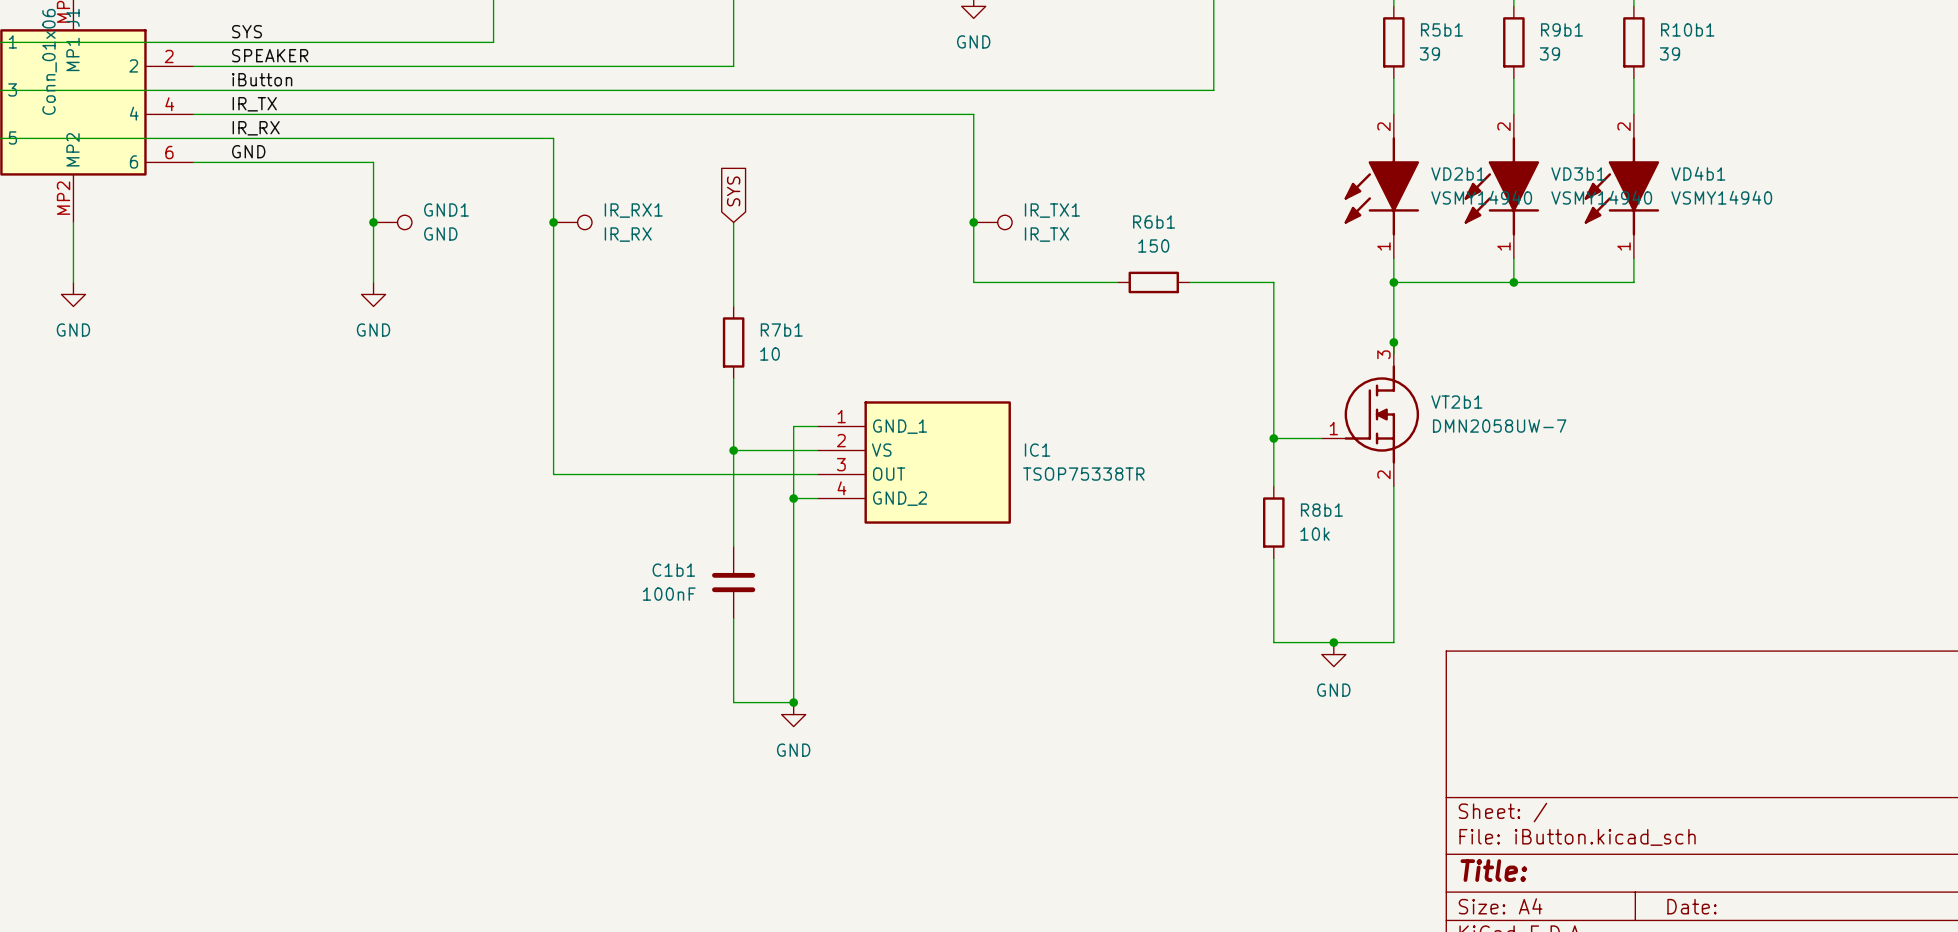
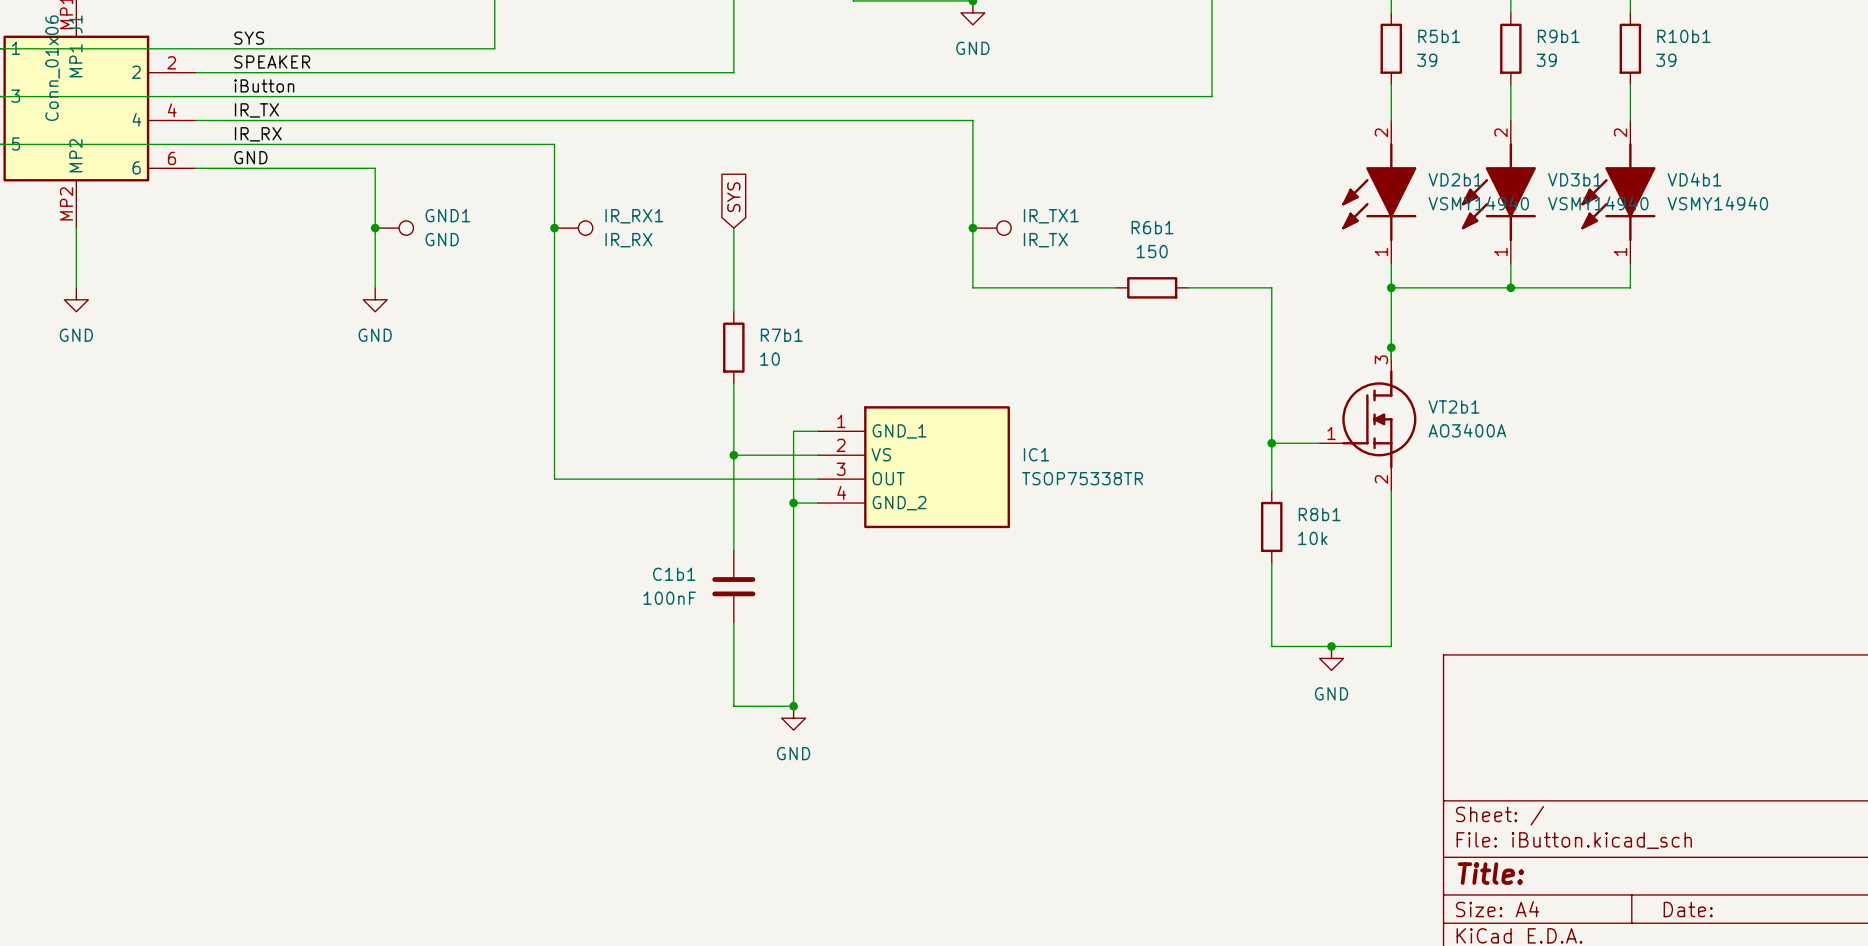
VT2b1 value: DMN2058UW-7 (1499, 426) -> AO3400A (1467, 430)

